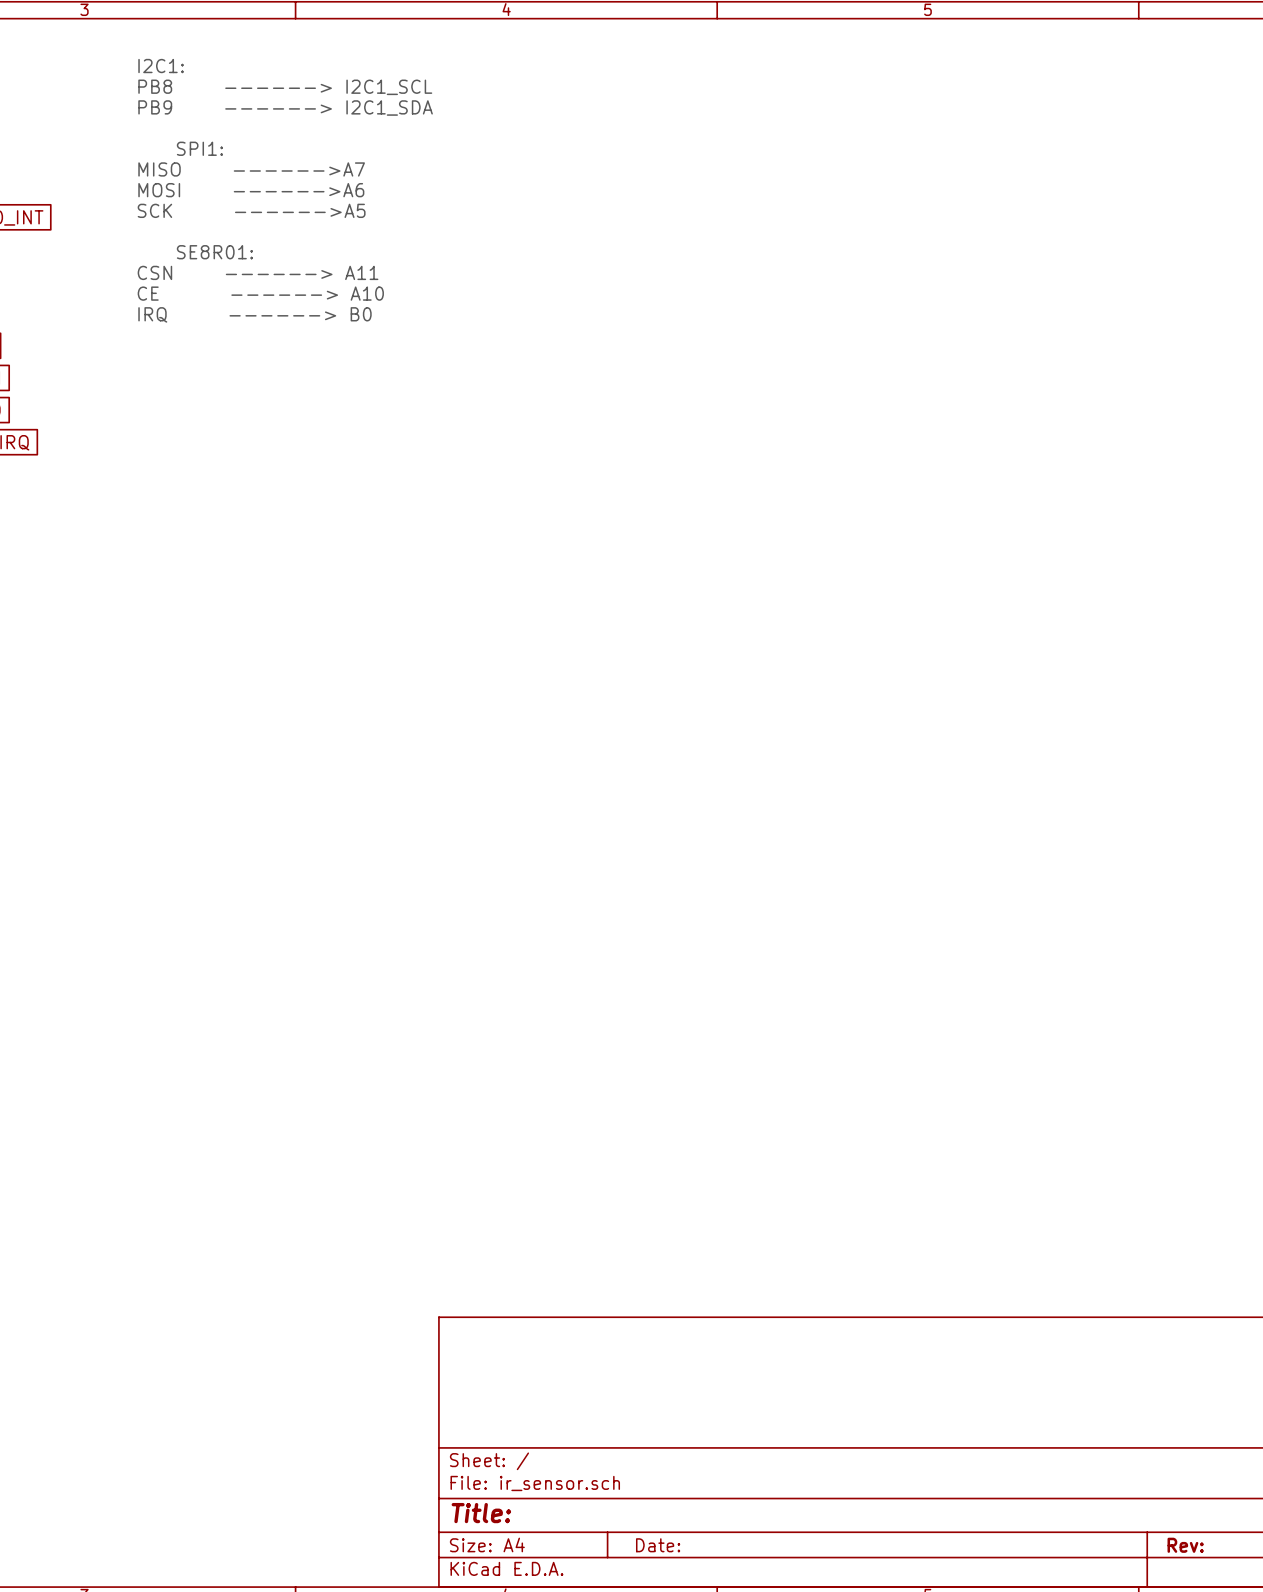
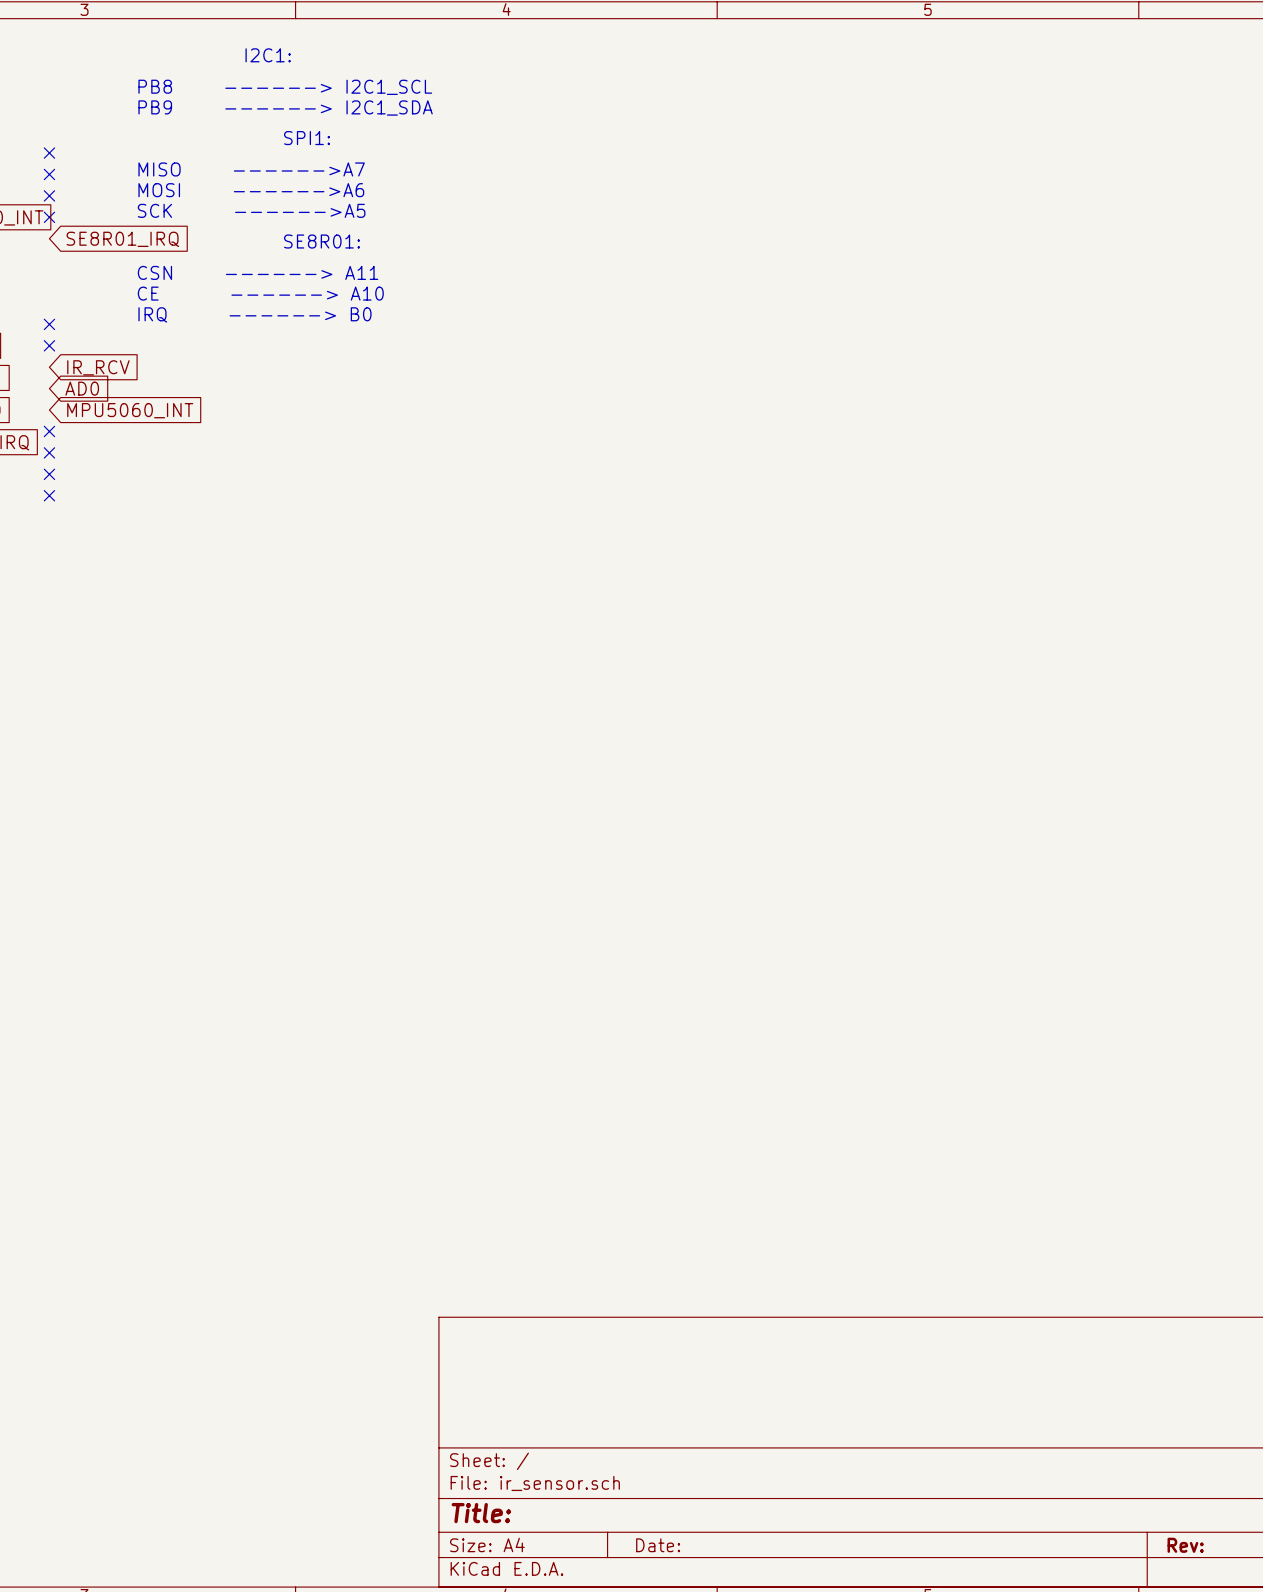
text position: I2C1: (161, 66) -> I2C1: (268, 55)
text position: SPI1: (199, 148) -> SPI1: (307, 138)
no-connect mark: none -> (49, 153)
no-connect mark: none -> (49, 174)
no-connect mark: none -> (49, 195)
no-connect mark: none -> (49, 217)
global label: none -> SE8R01_IRQ (122, 239)
text position: SE8R01: (214, 252) -> SE8R01: (321, 241)
no-connect mark: none -> (49, 324)
no-connect mark: none -> (49, 345)
global label: none -> IR_RCV (98, 367)
global label: none -> AD0 (82, 388)
global label: none -> MPU5060_INT (130, 410)
no-connect mark: none -> (49, 431)
no-connect mark: none -> (49, 452)
no-connect mark: none -> (49, 474)
no-connect mark: none -> (49, 495)

